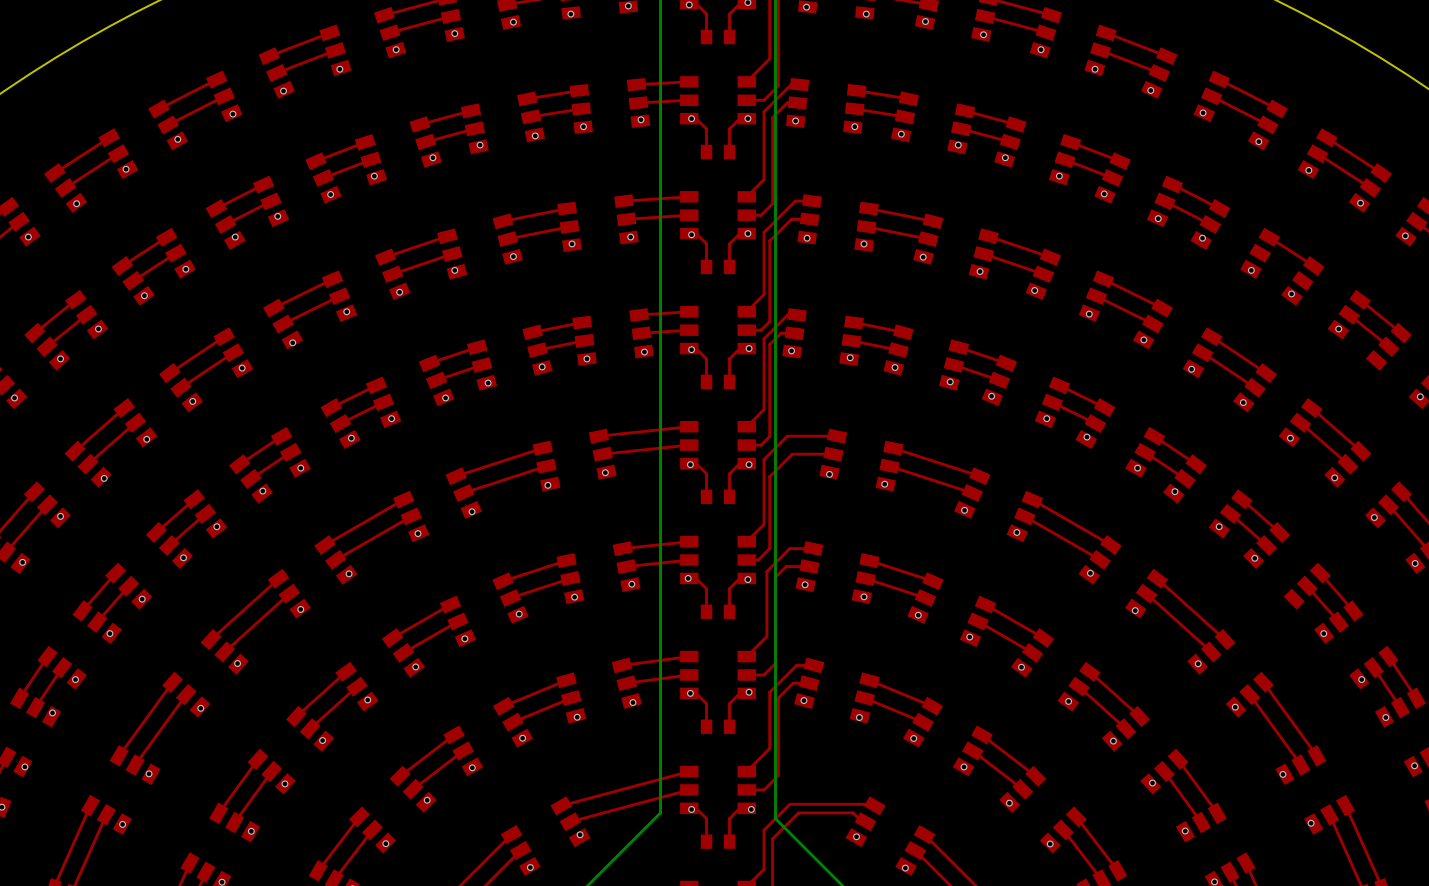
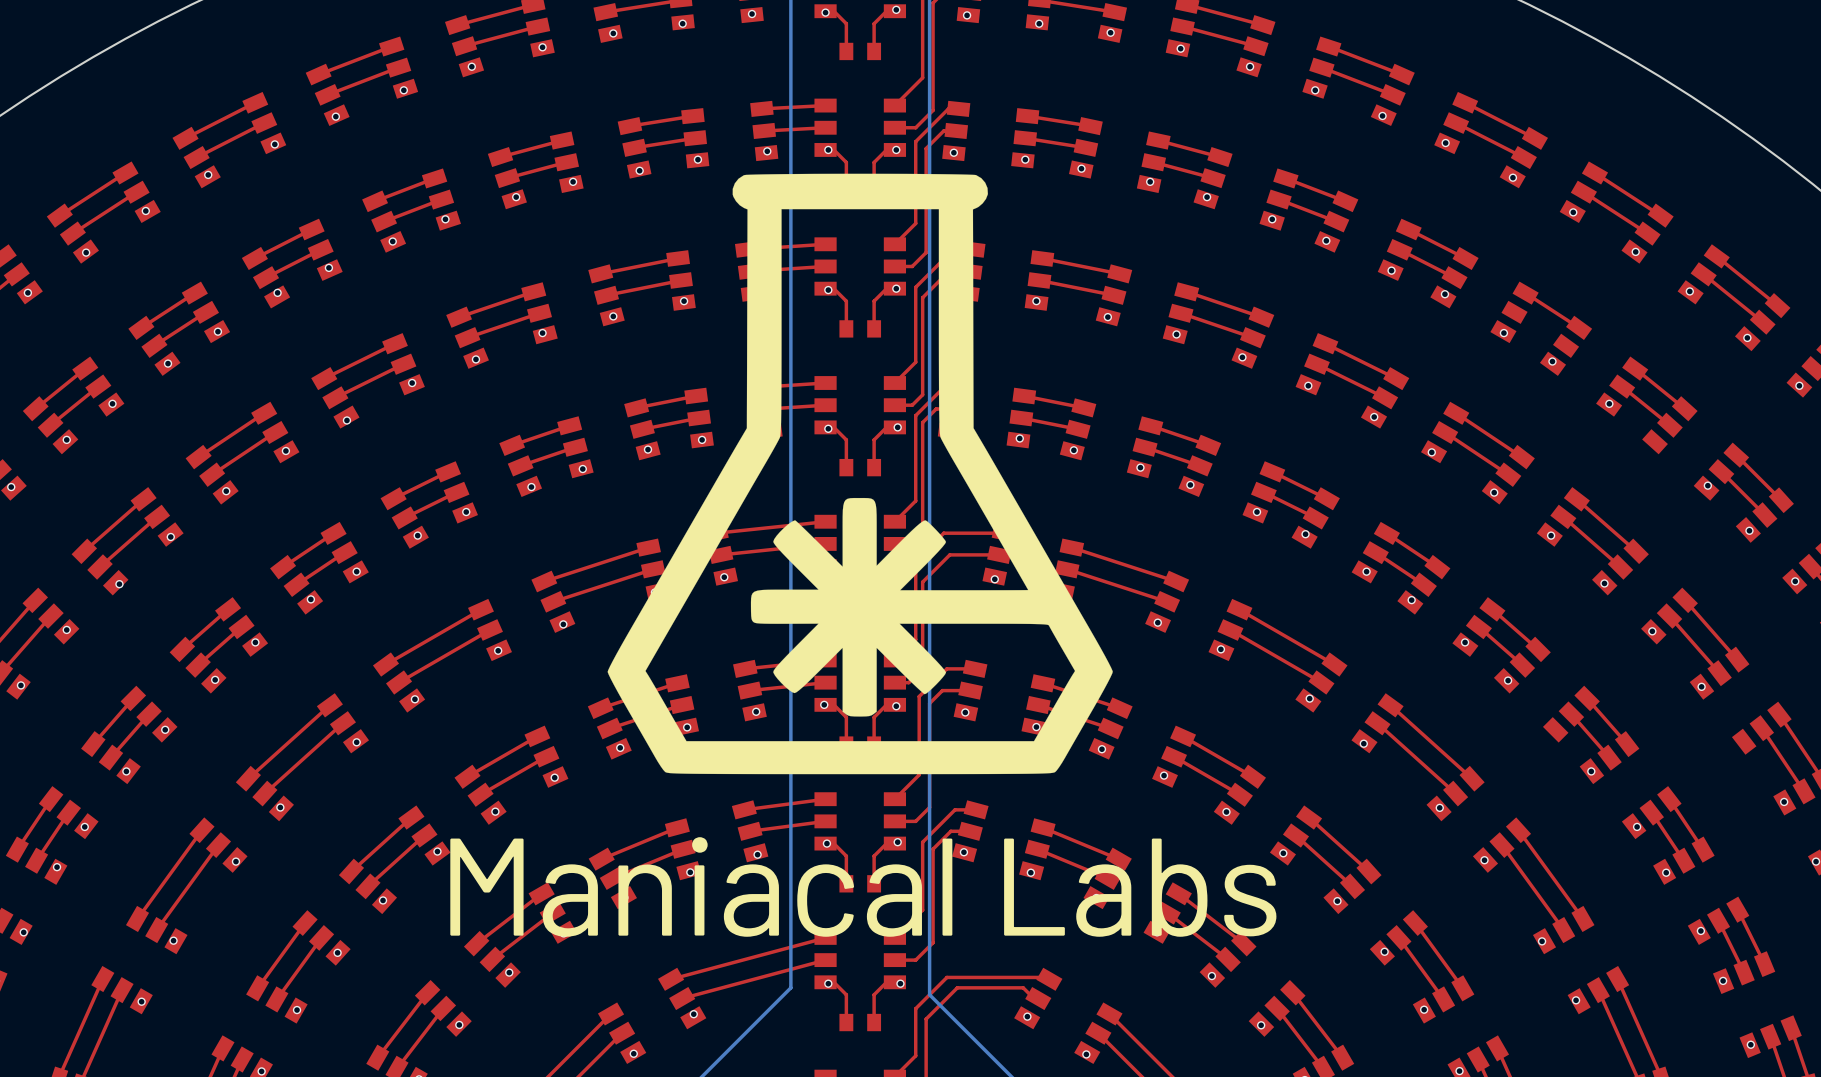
drawing: none -> [607, 173, 1113, 775]
text: none -> Maniacal Labs (863, 886)

